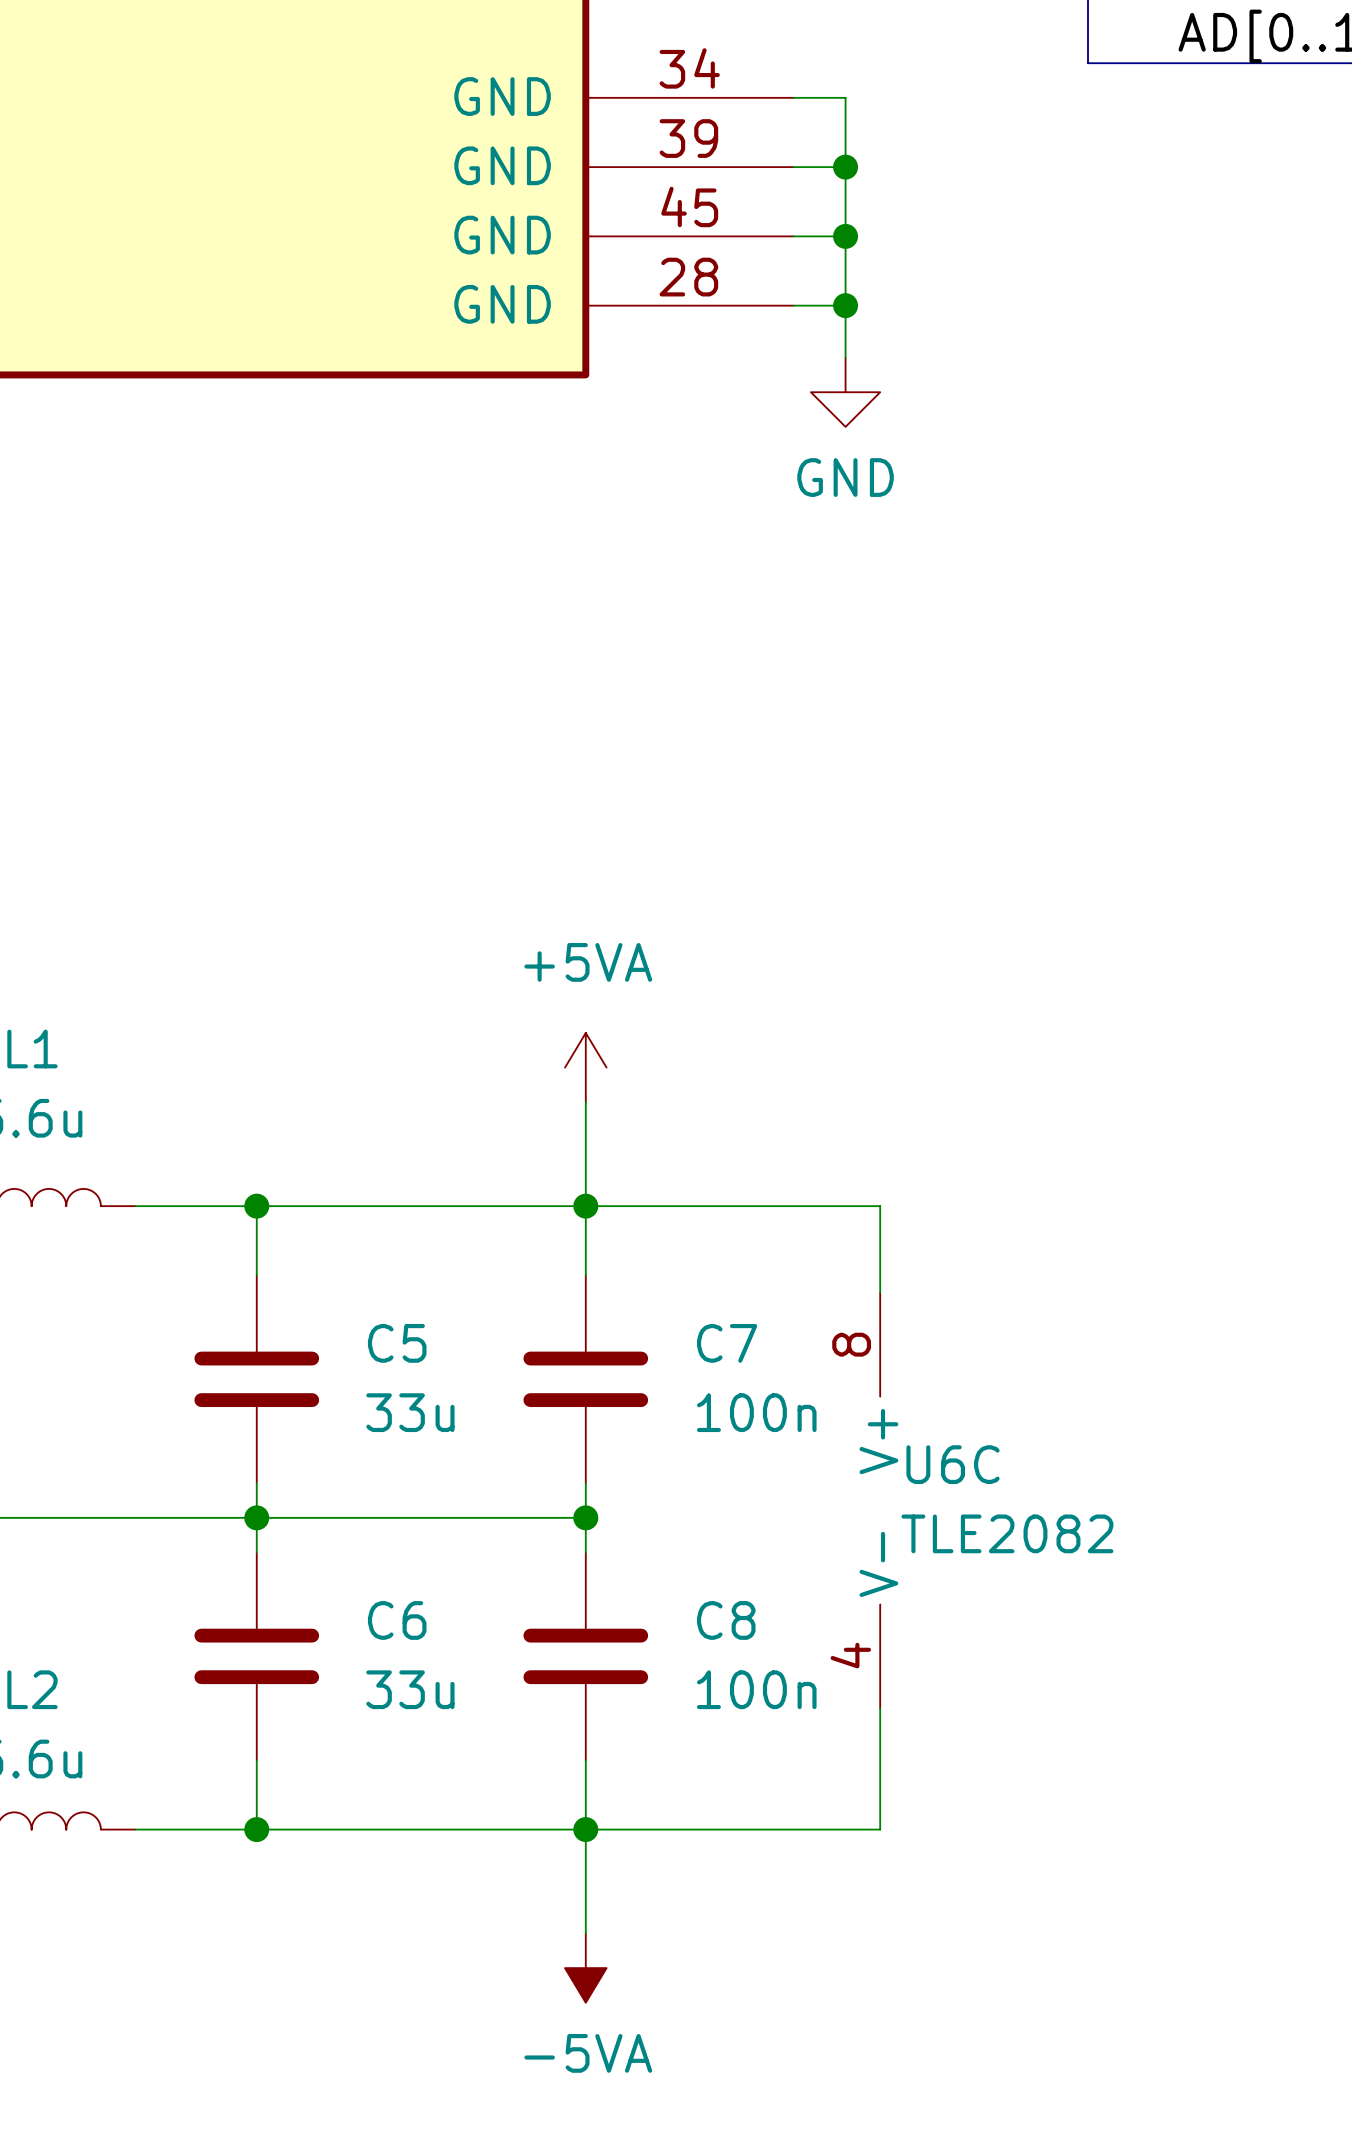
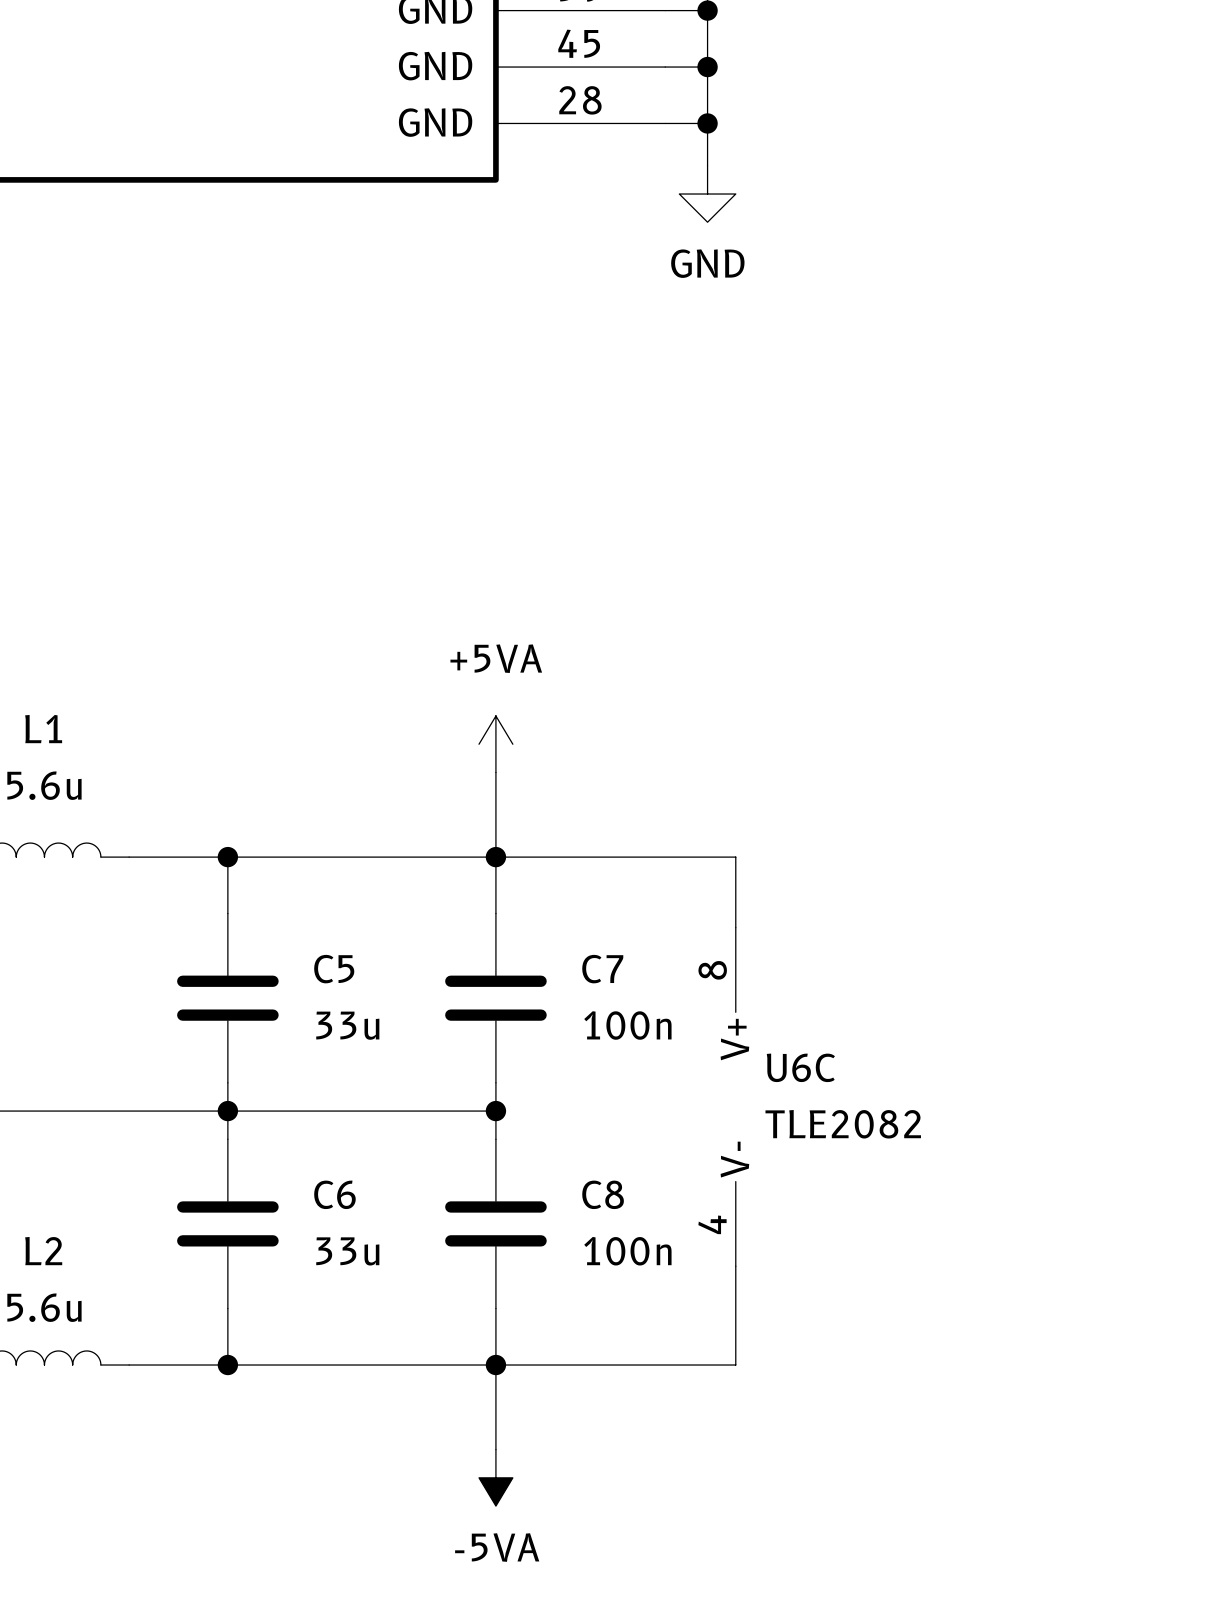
U6C name position: U6C (953, 1464) -> U6C (800, 1067)
U6C value position: TLE2082 (1007, 1533) -> TLE2082 (843, 1124)

